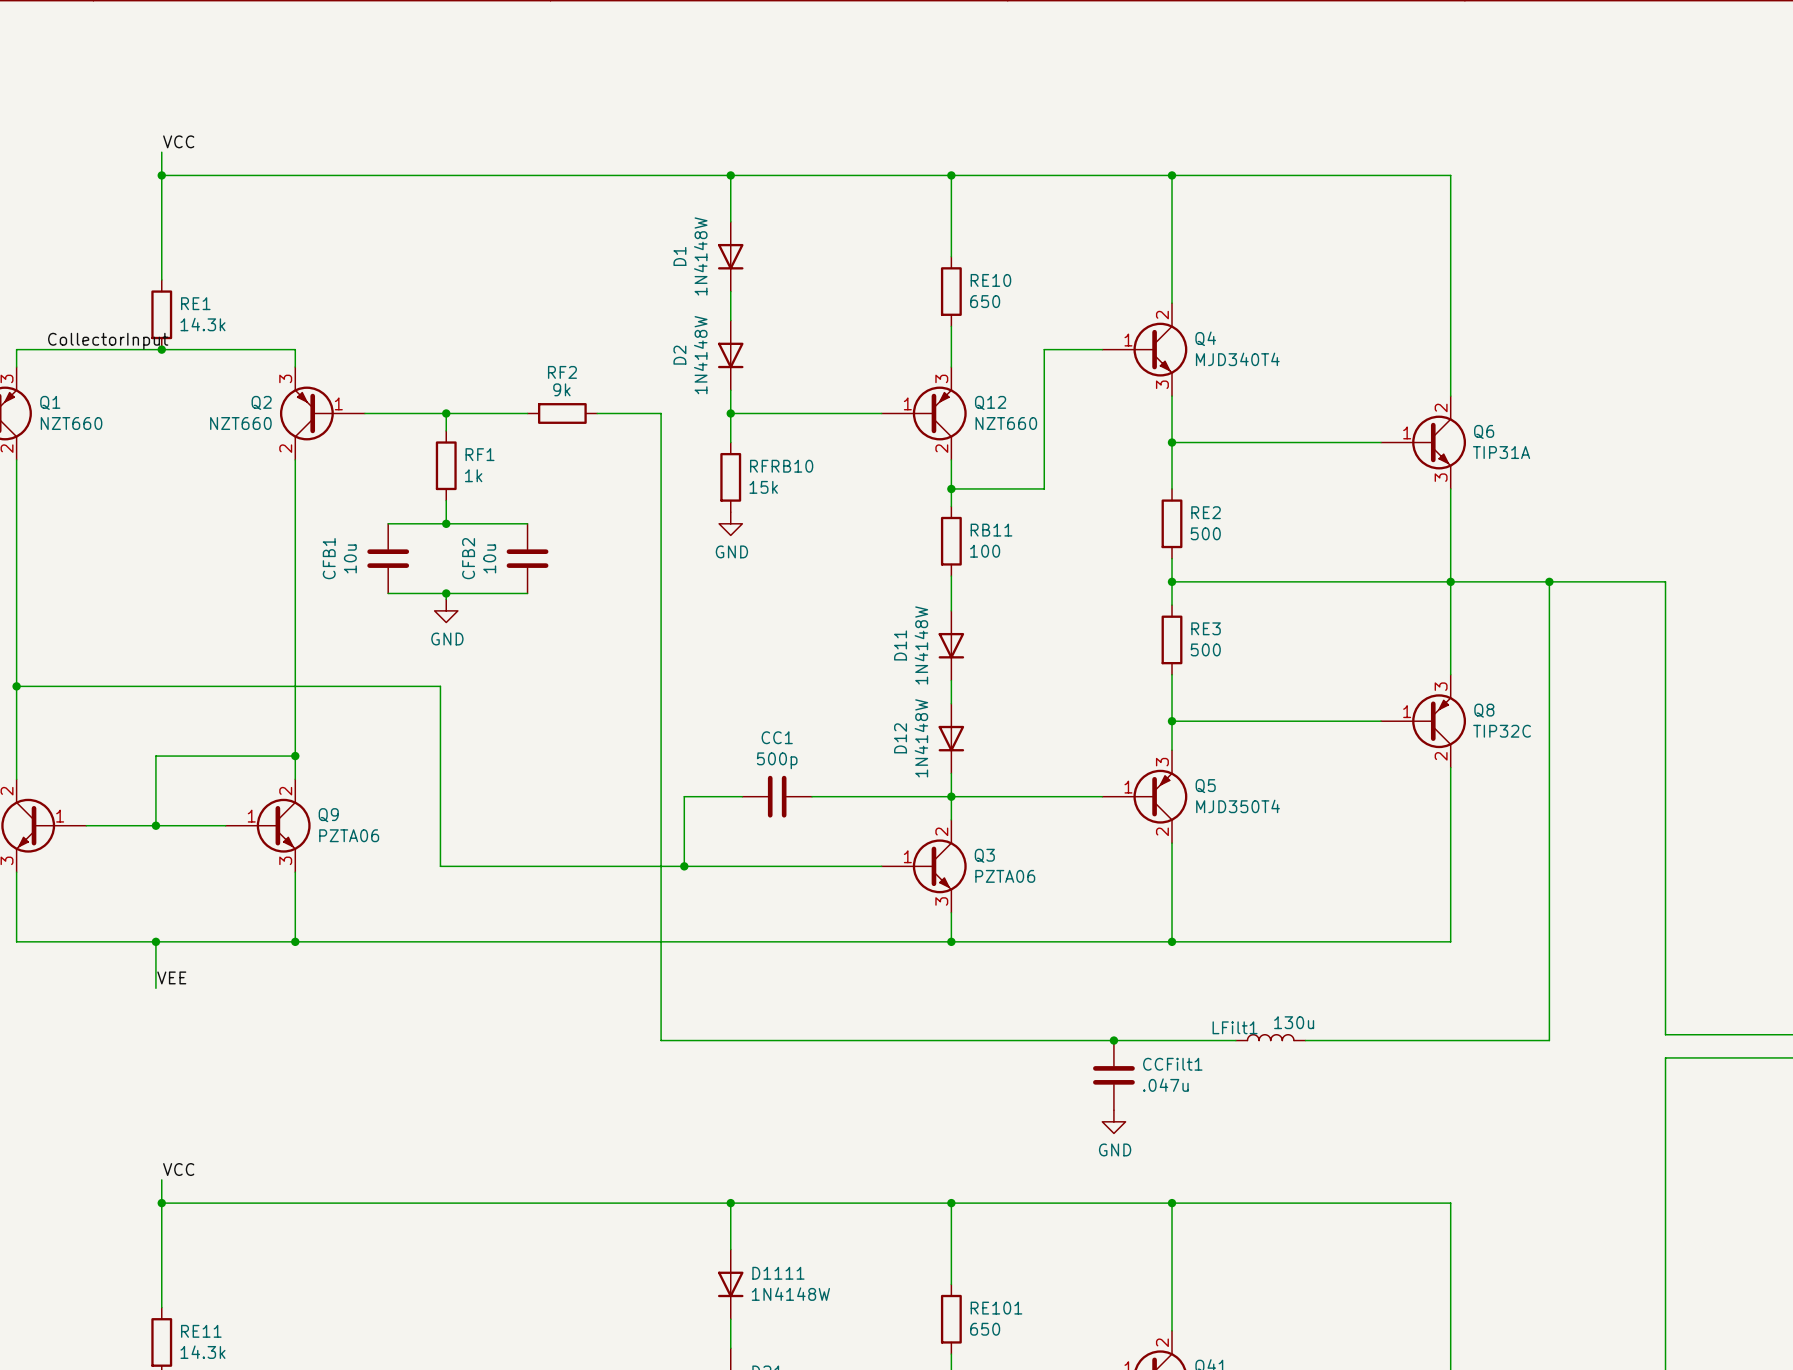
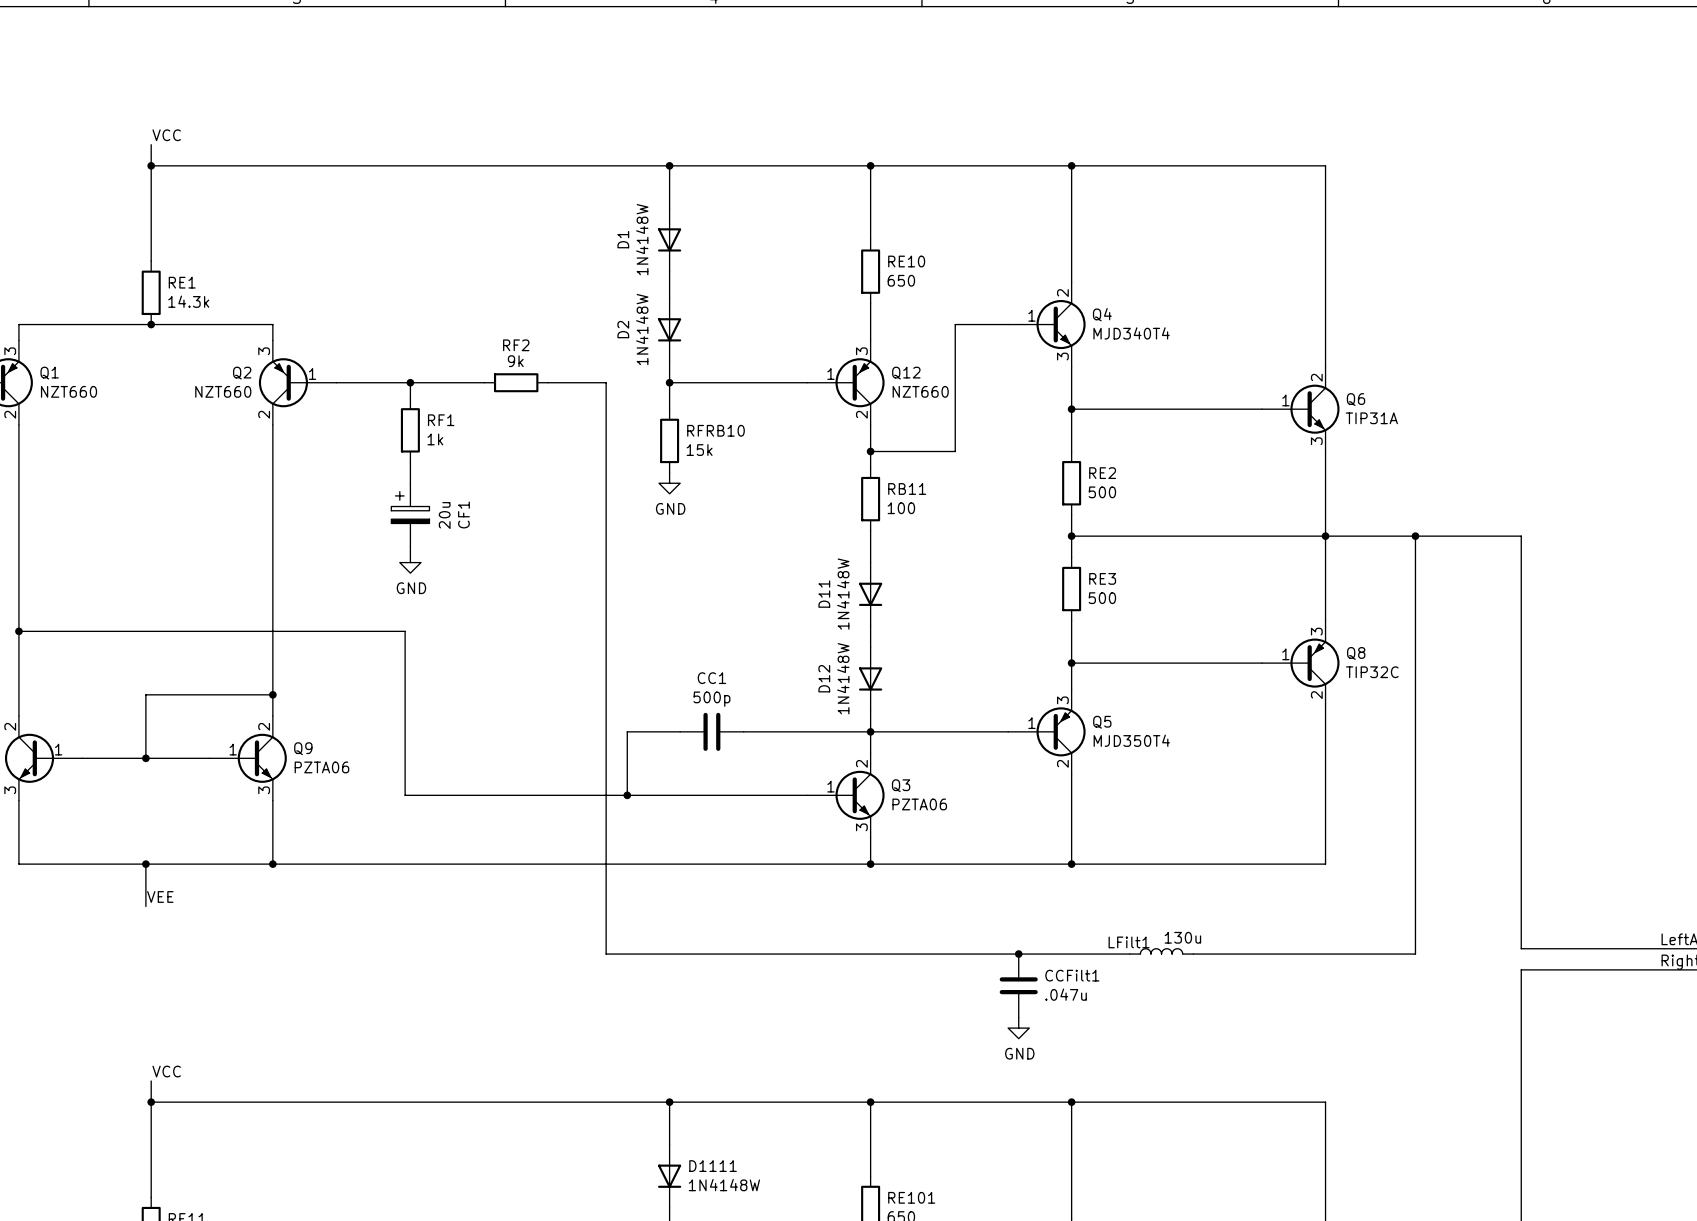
label: CollectorInput (108, 341) -> none
wire: (388, 523) (527, 523) -> none
junction: (446, 523) -> none
CFB1: 10u (388, 558) -> none
CF1: none -> 20u (410, 514)
CFB2: 10u (527, 558) -> none
wire: (388, 593) (527, 593) -> none
junction: (446, 593) -> none

